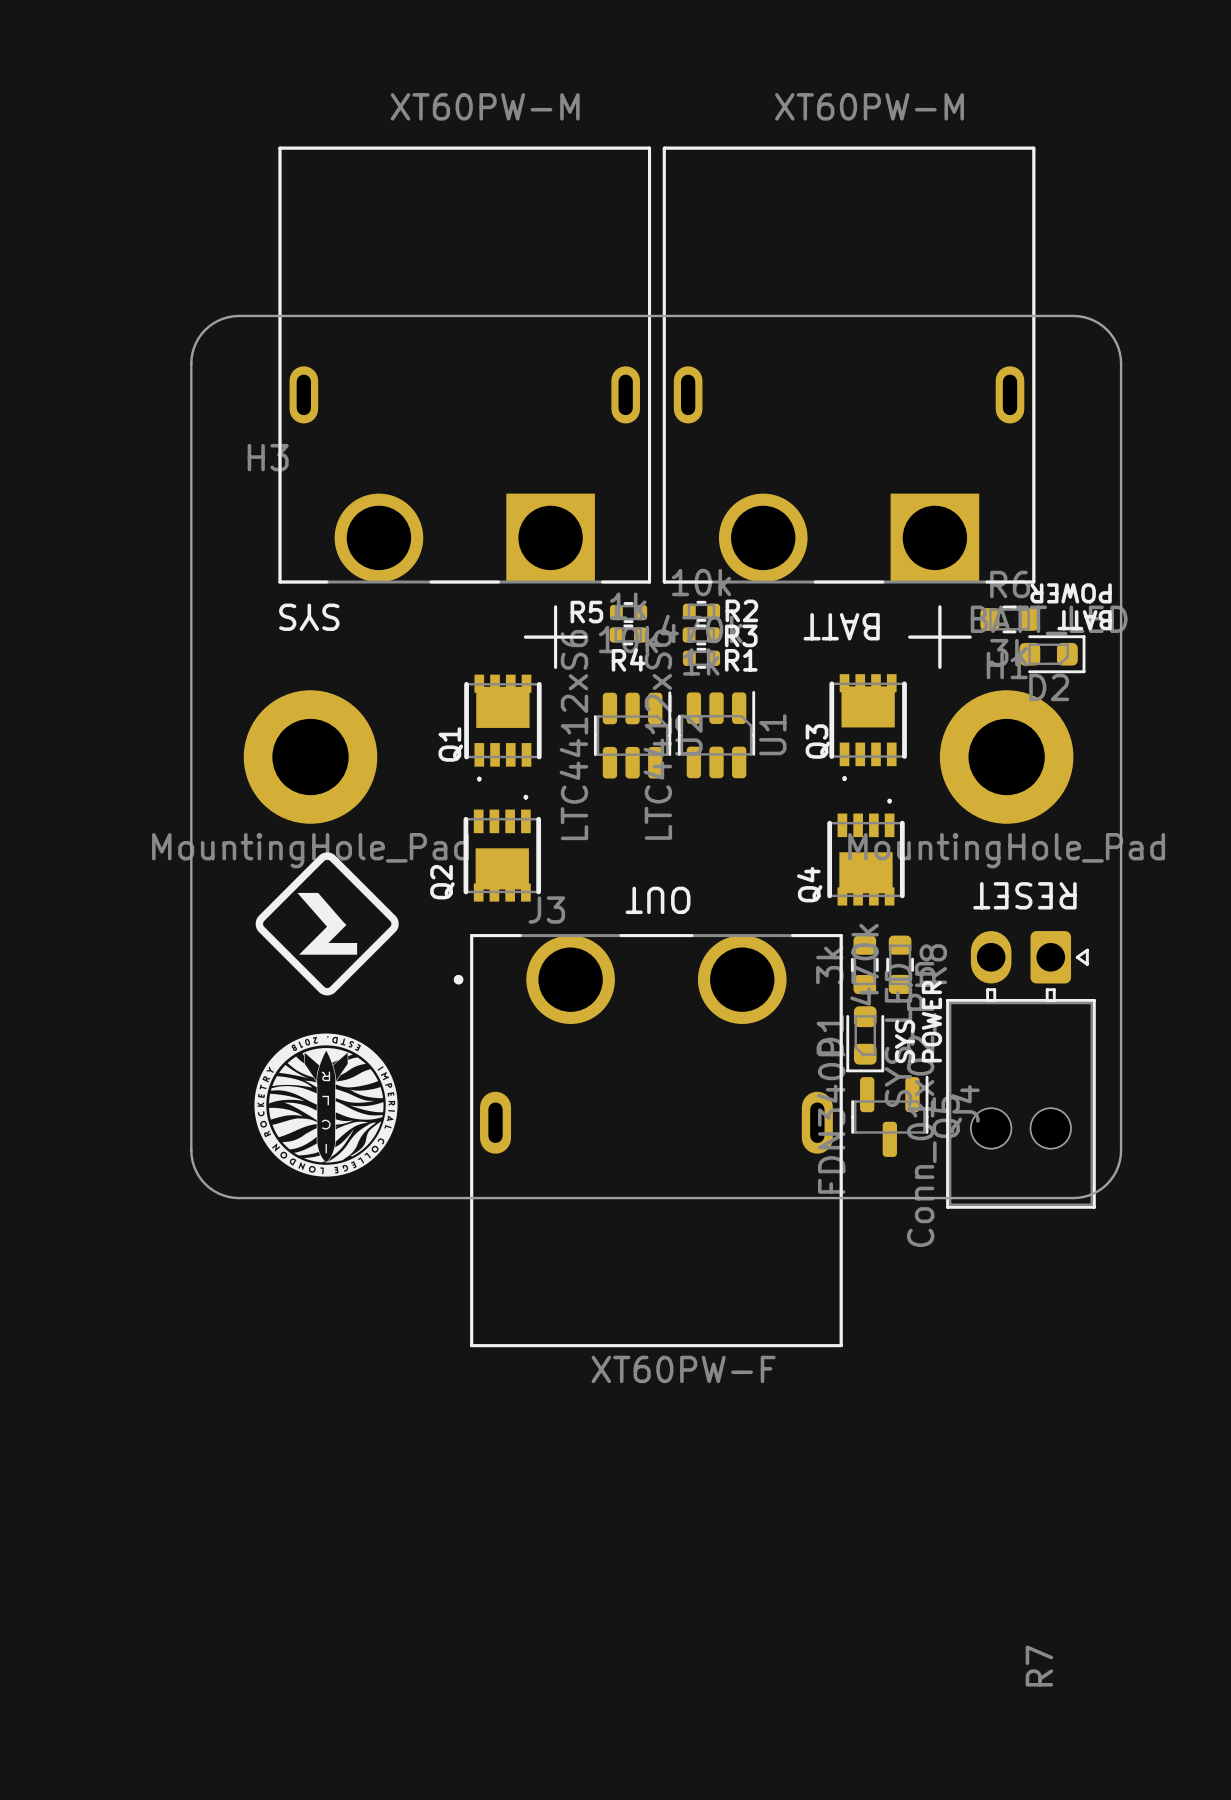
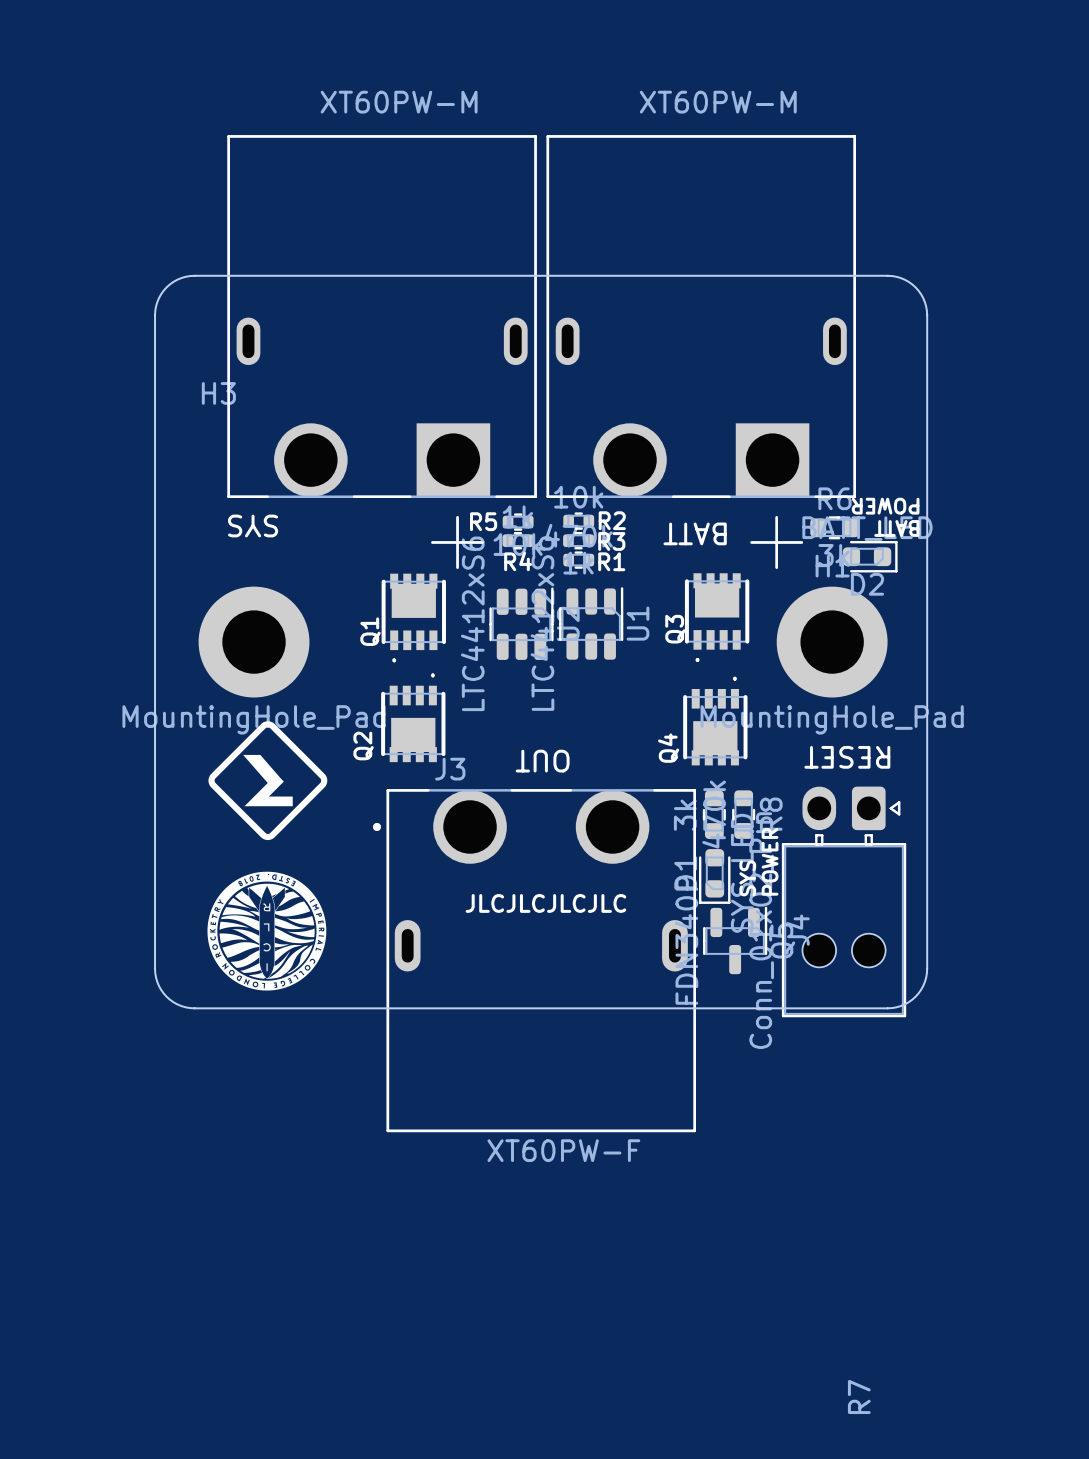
text: none -> JLCJLCJLCJLC (545, 903)

